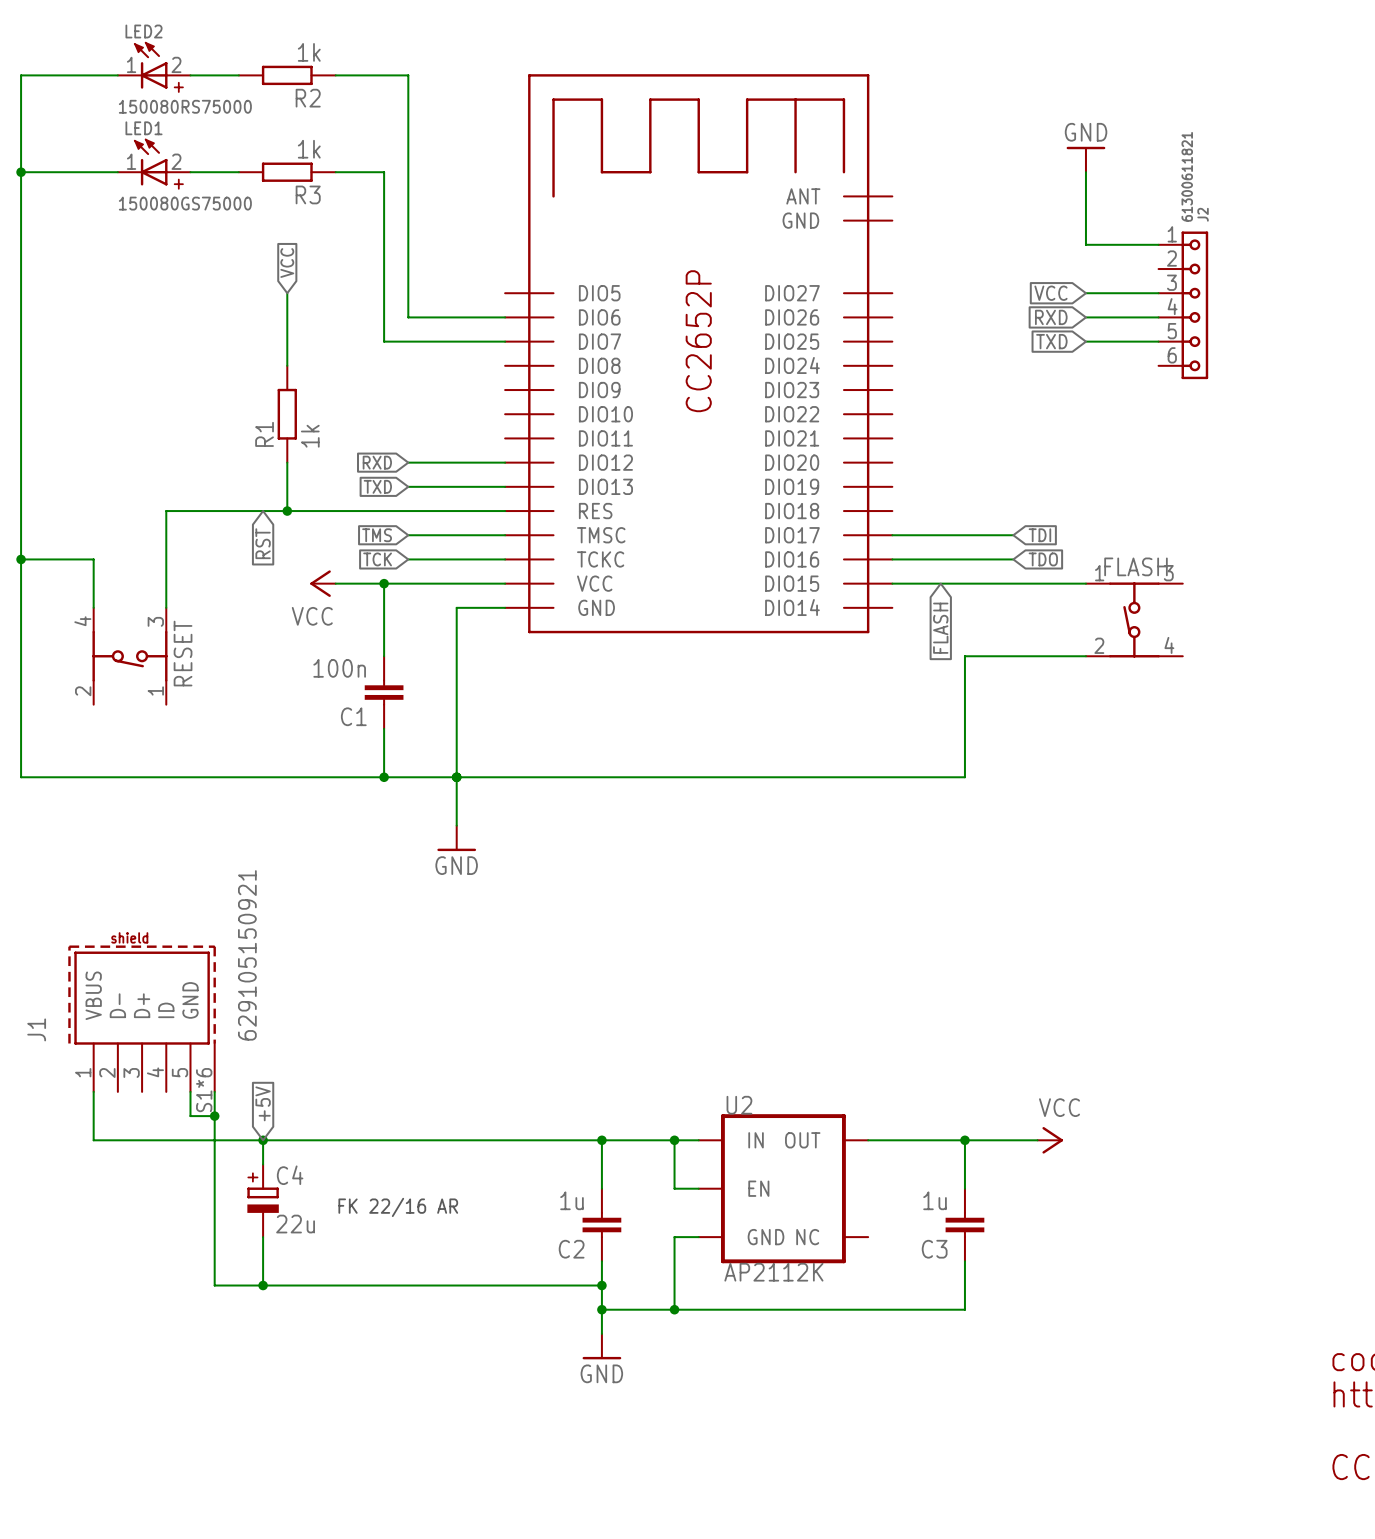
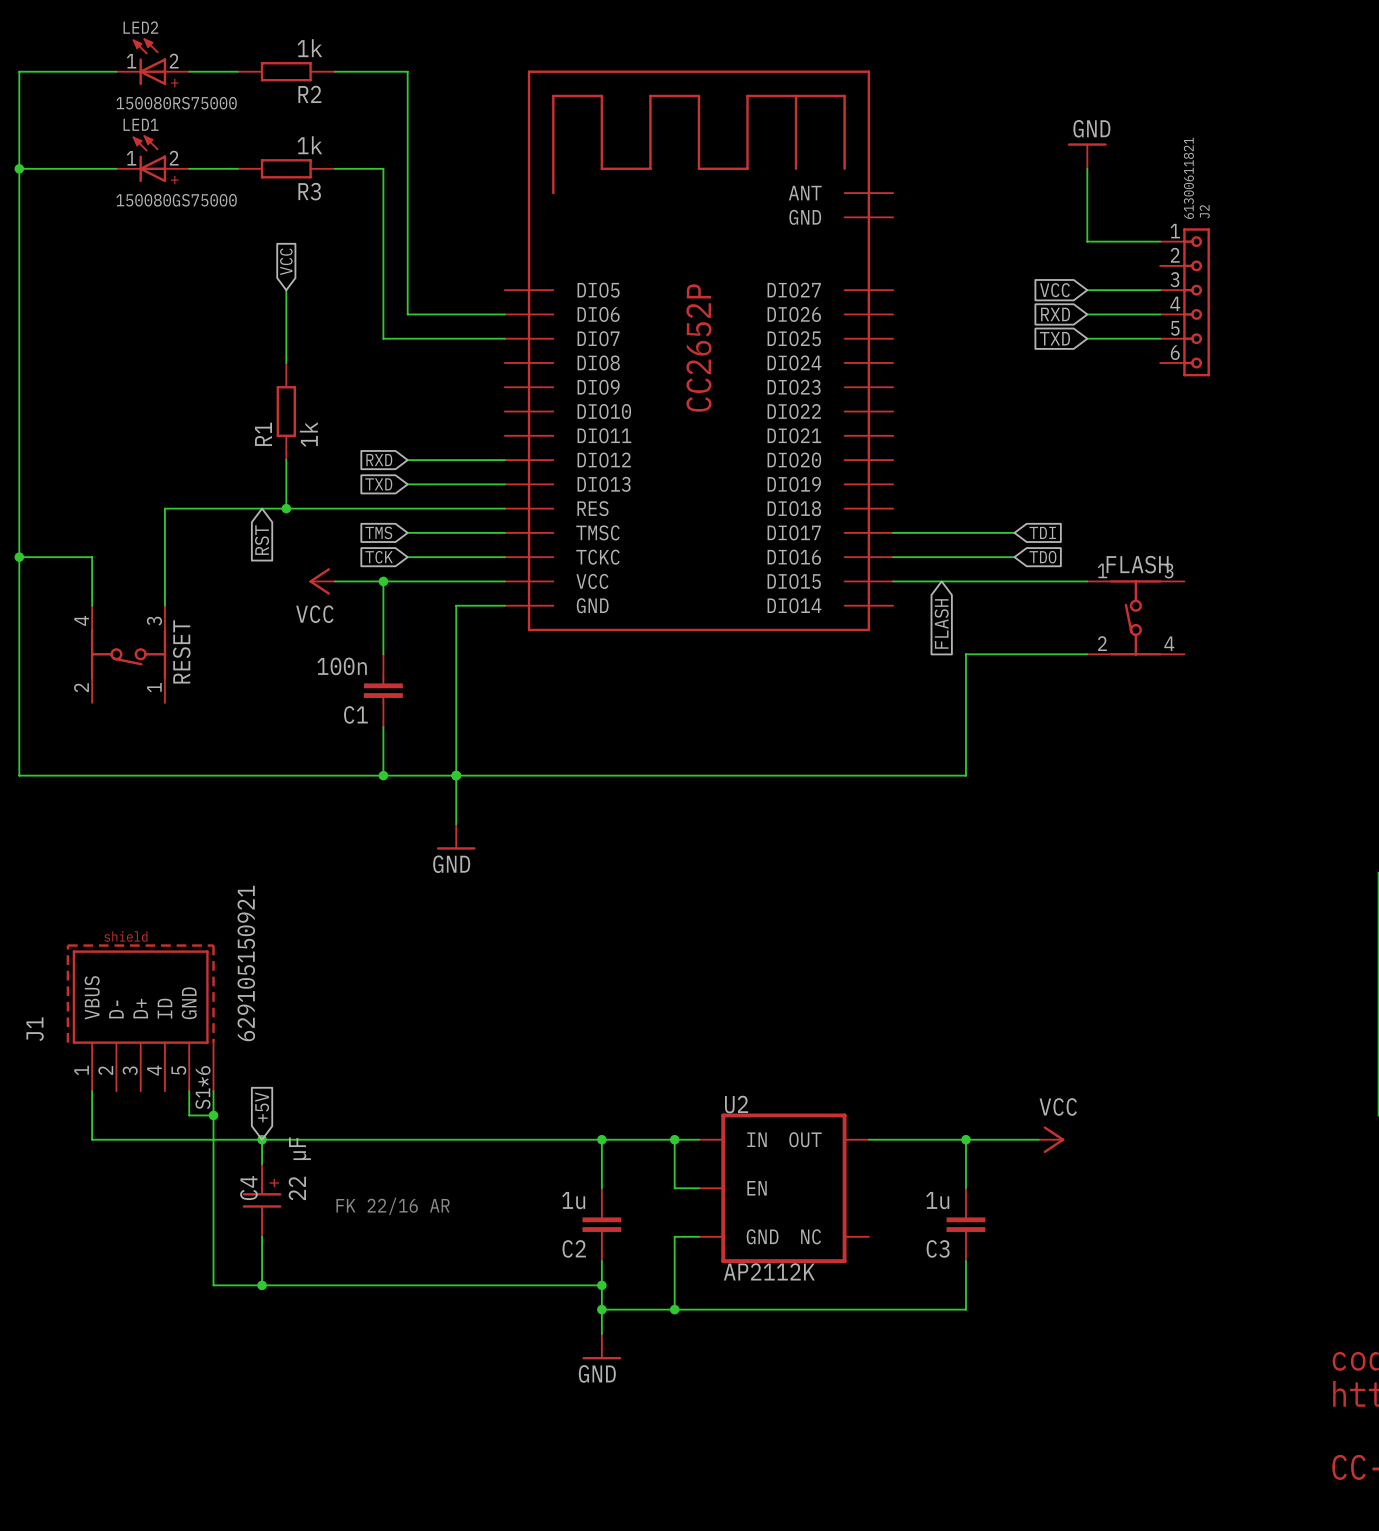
C4 symbol: [247, 1164, 279, 1238] -> [242, 1164, 282, 1237]
C4 name position: C4 (290, 1175) -> C4 (248, 1188)
C4 value: 22u (295, 1224) -> 22 µF (299, 1168)

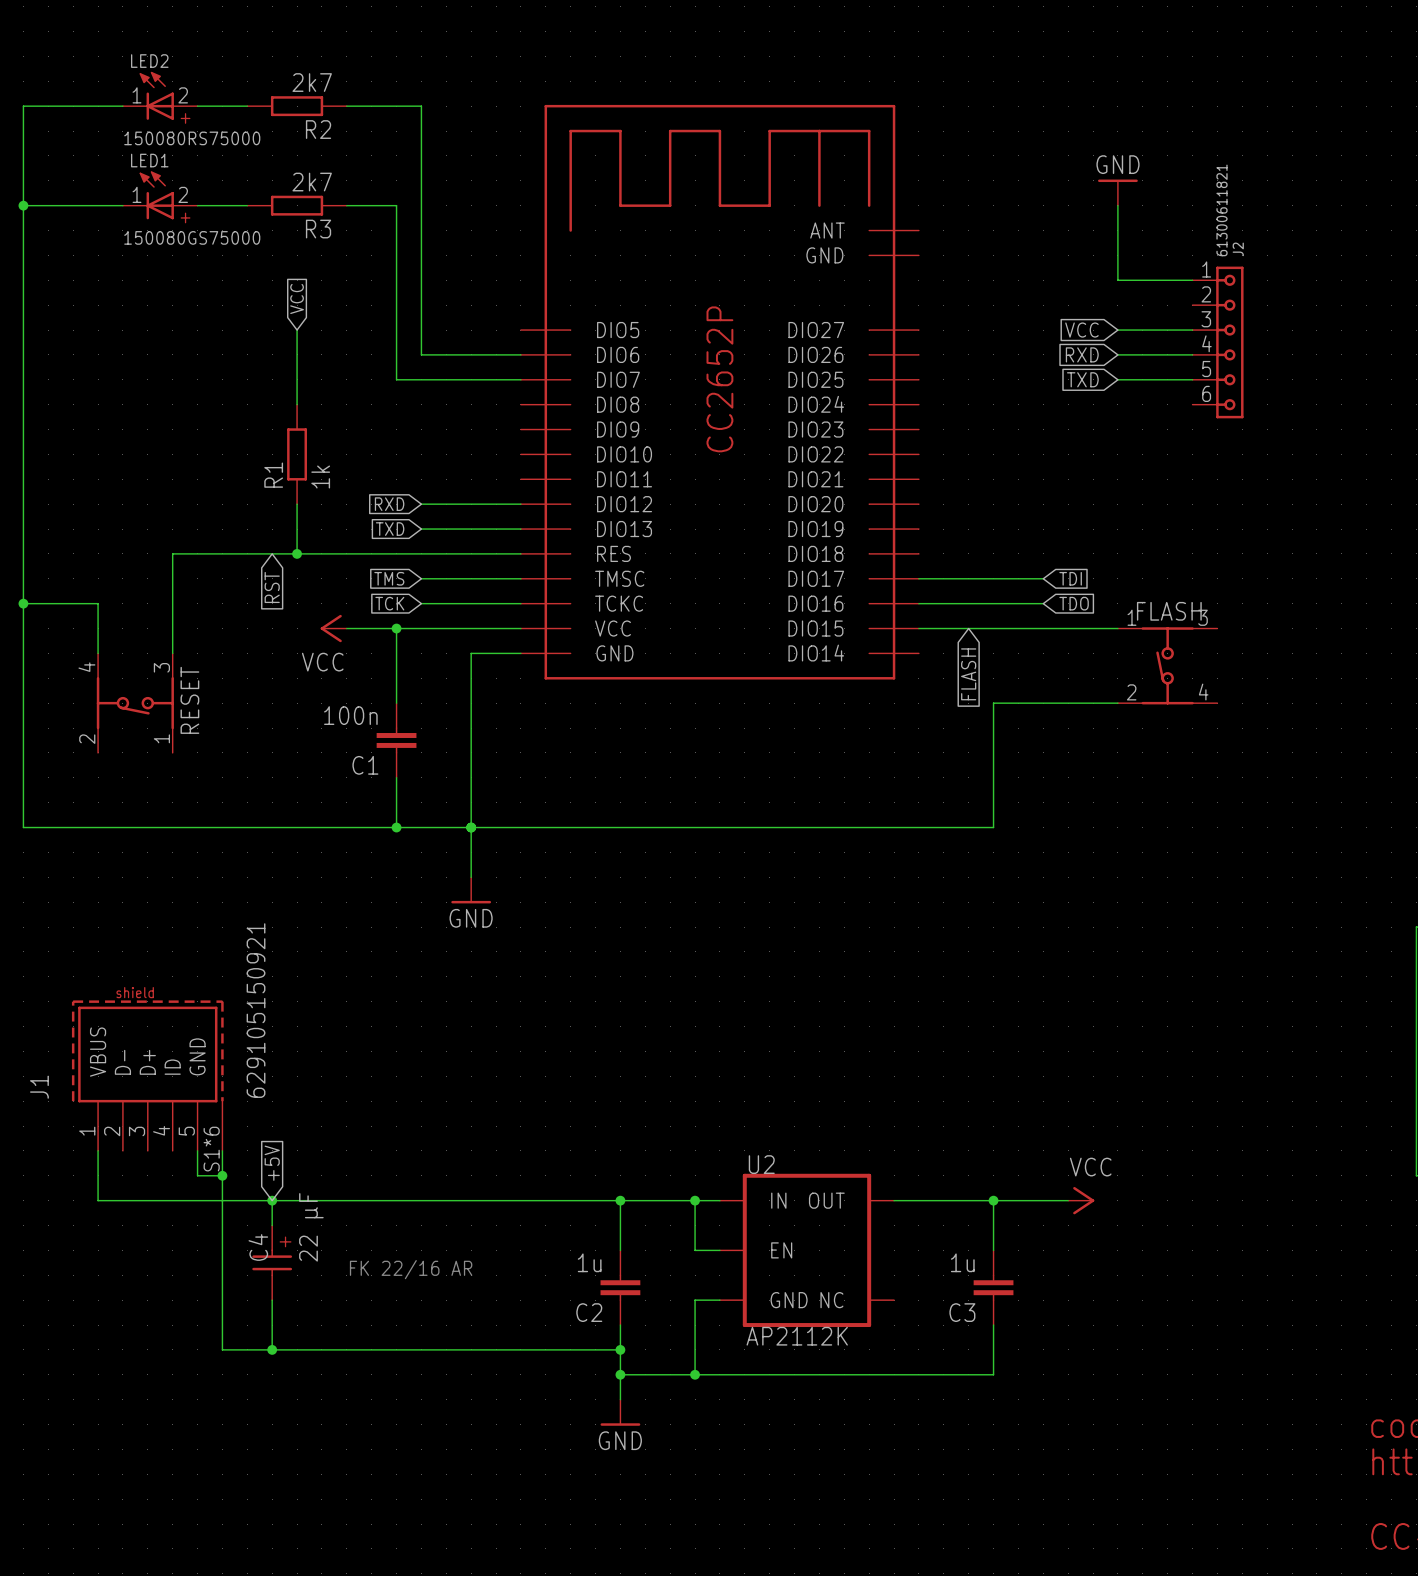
R2 value: 1k (309, 48) -> 2k7 (312, 82)
R3 value: 1k (309, 145) -> 2k7 (312, 182)

